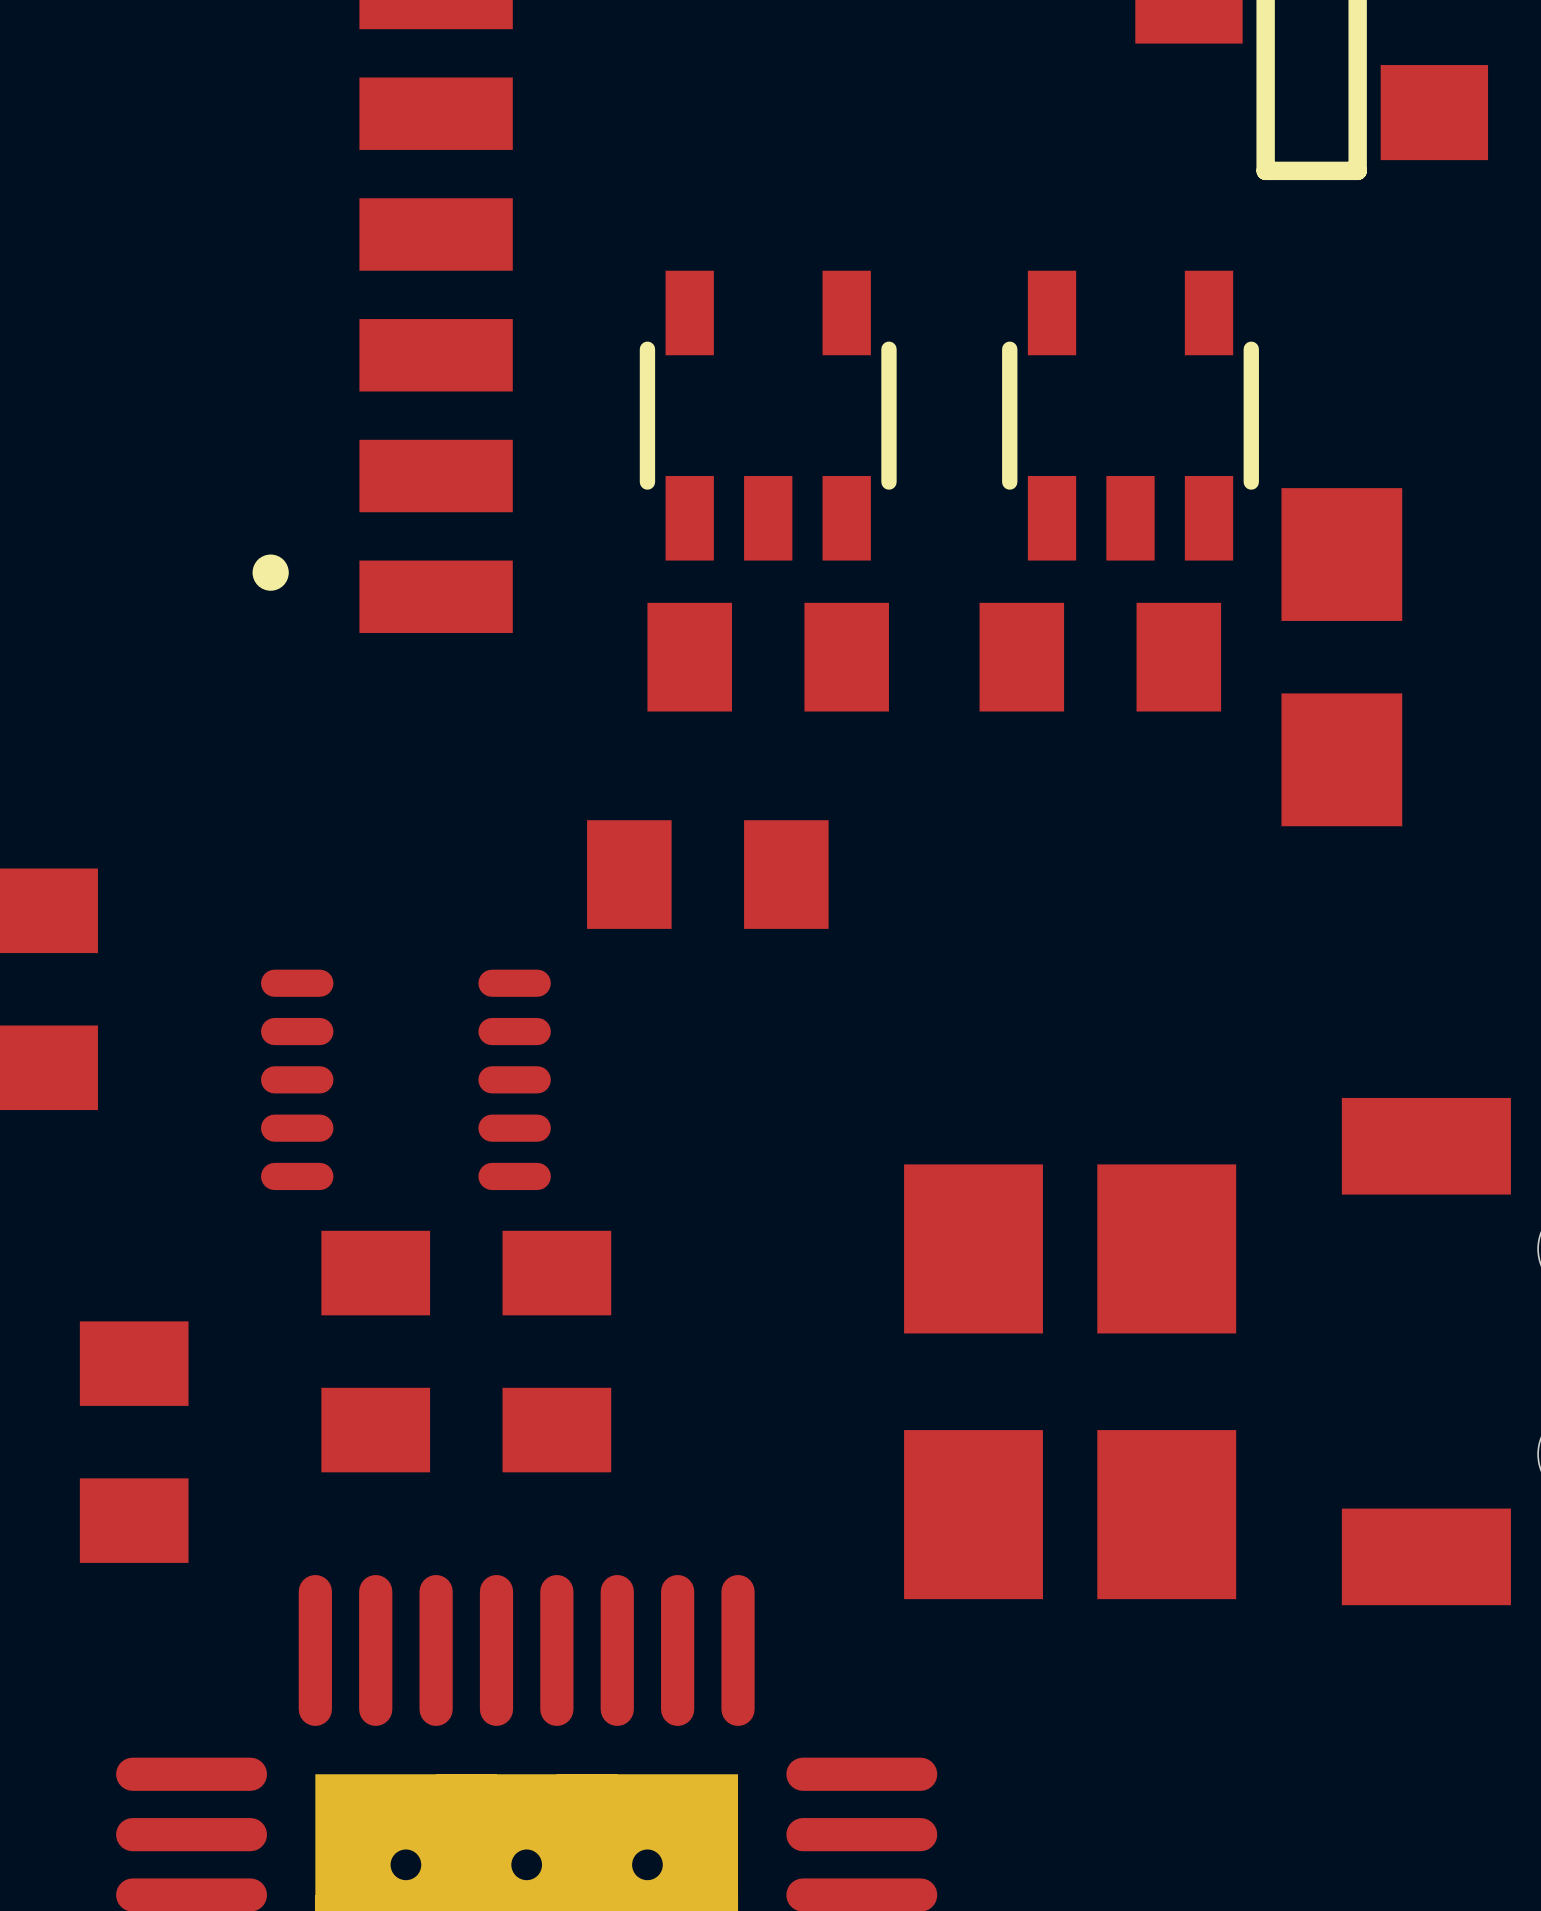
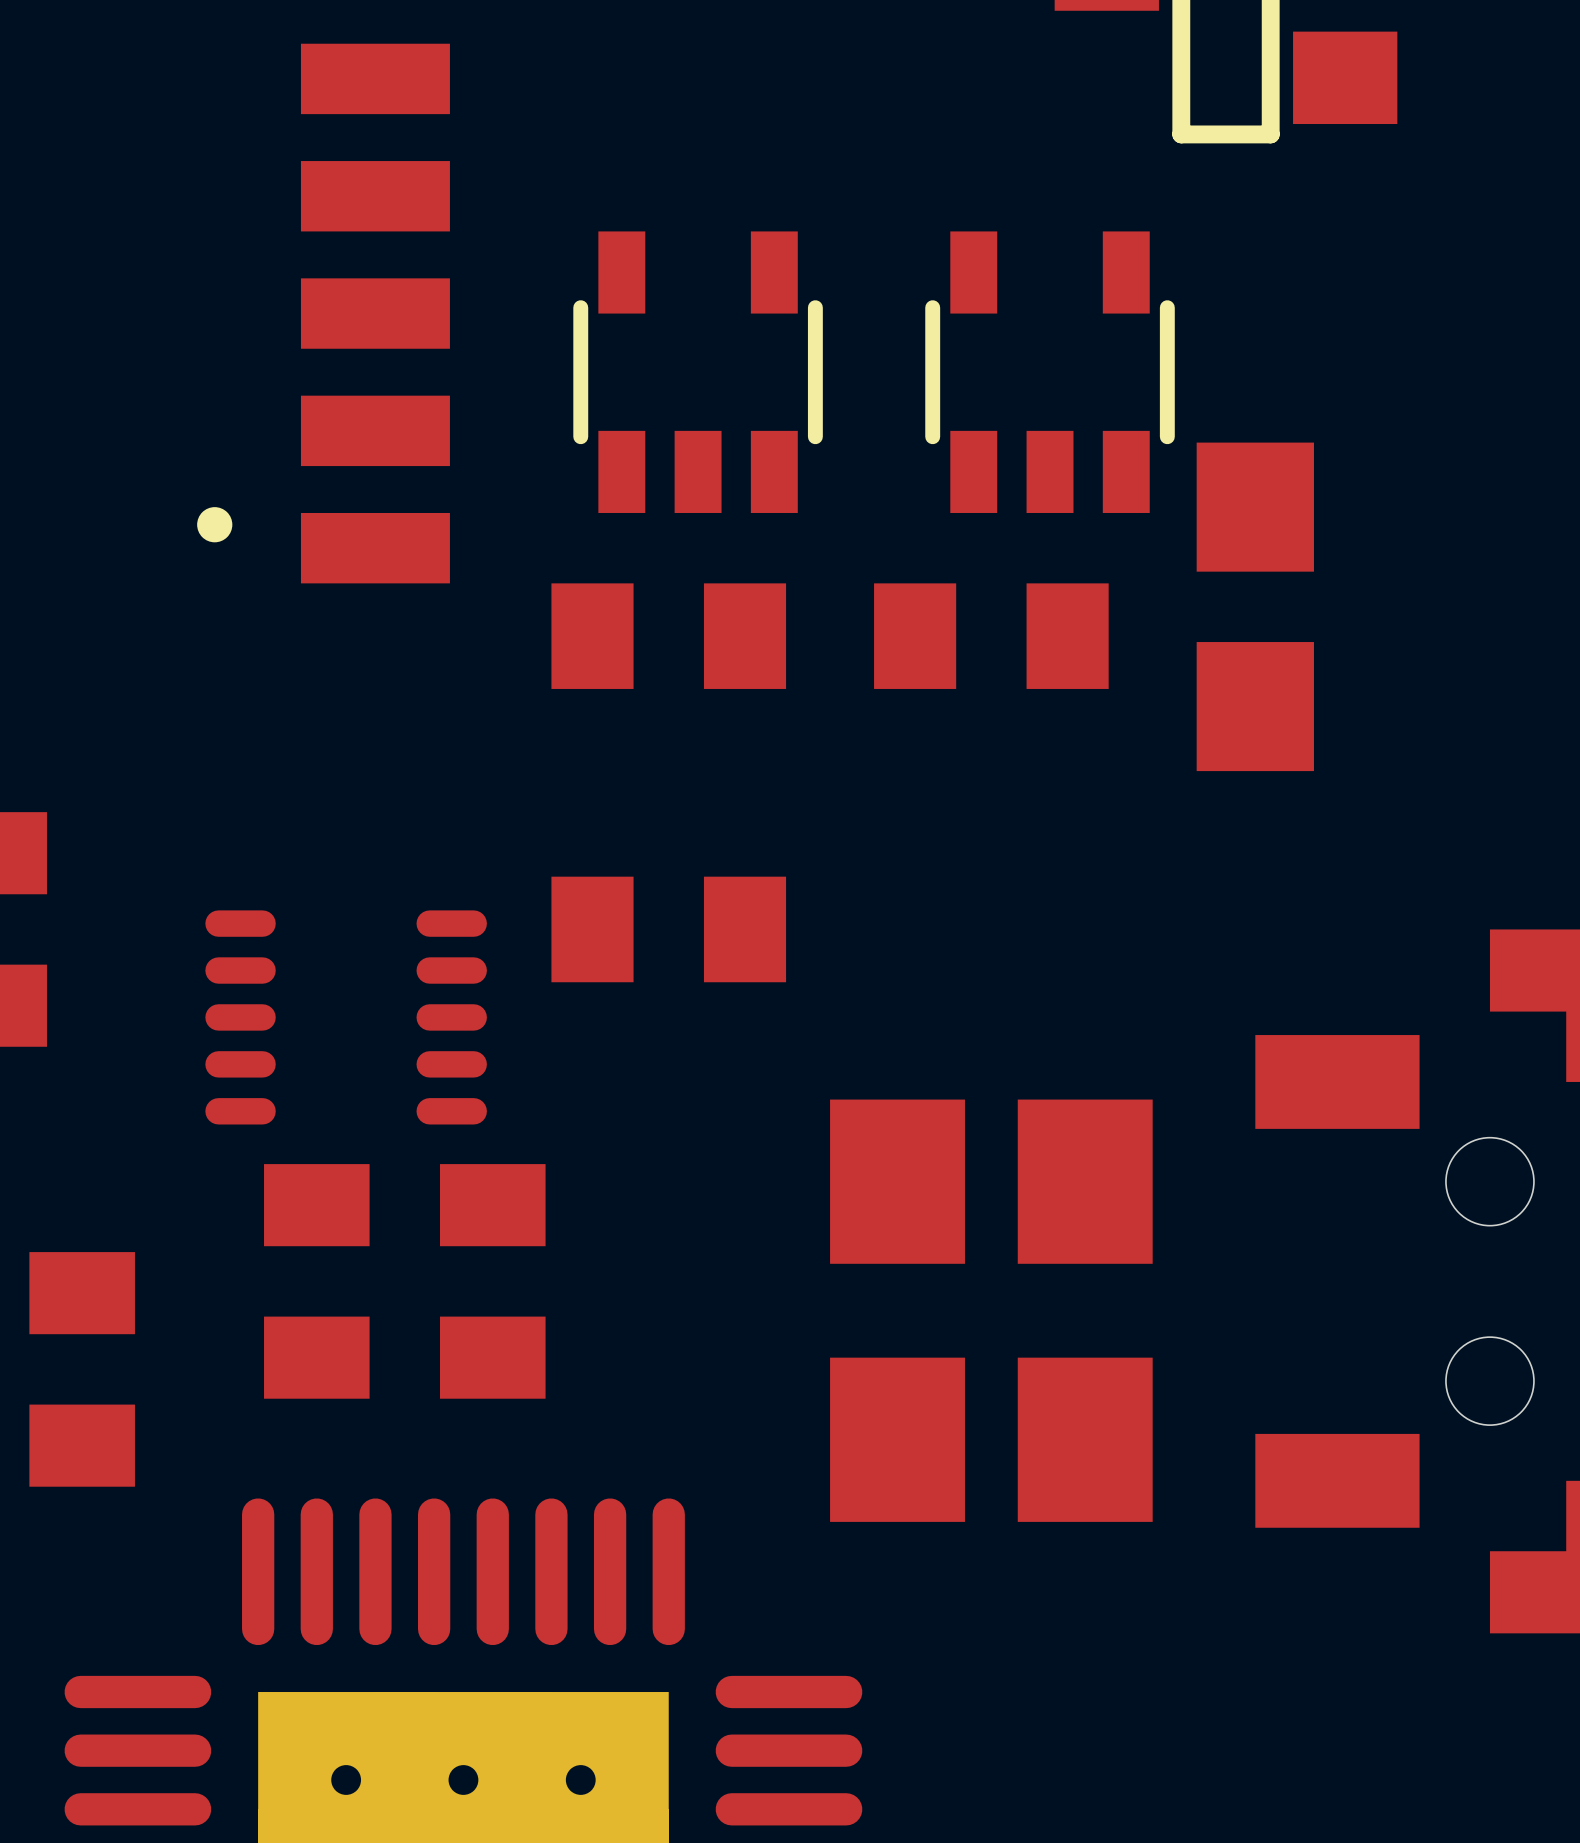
part position: (768, 657) -> (668, 636)
part position: (1100, 657) -> (991, 636)
part position: (707, 874) -> (668, 929)

